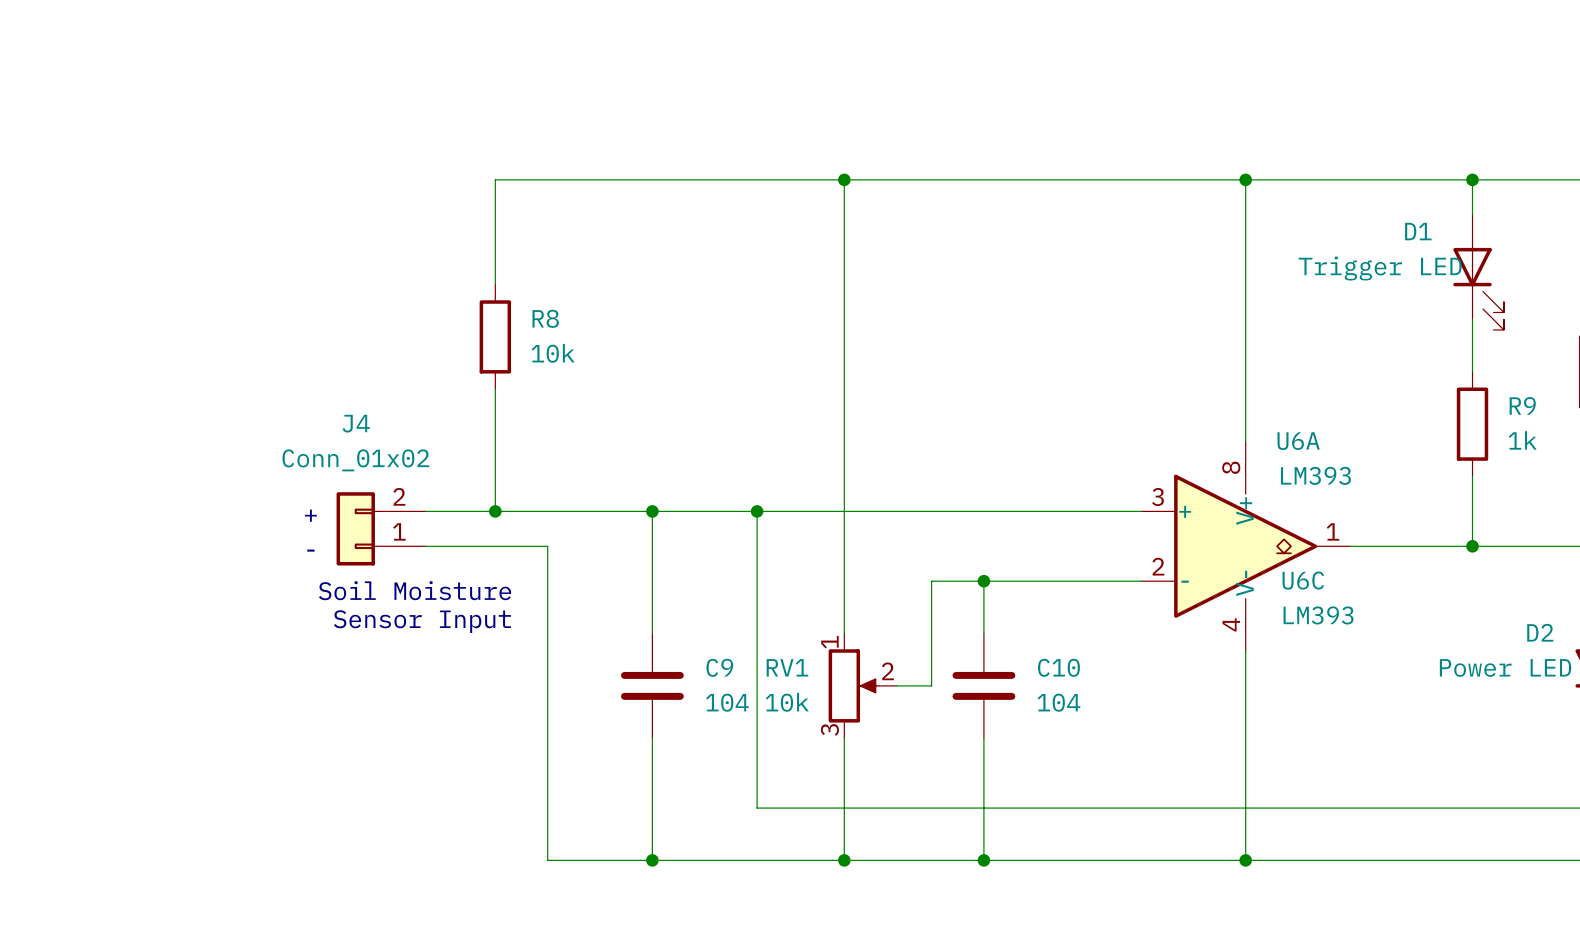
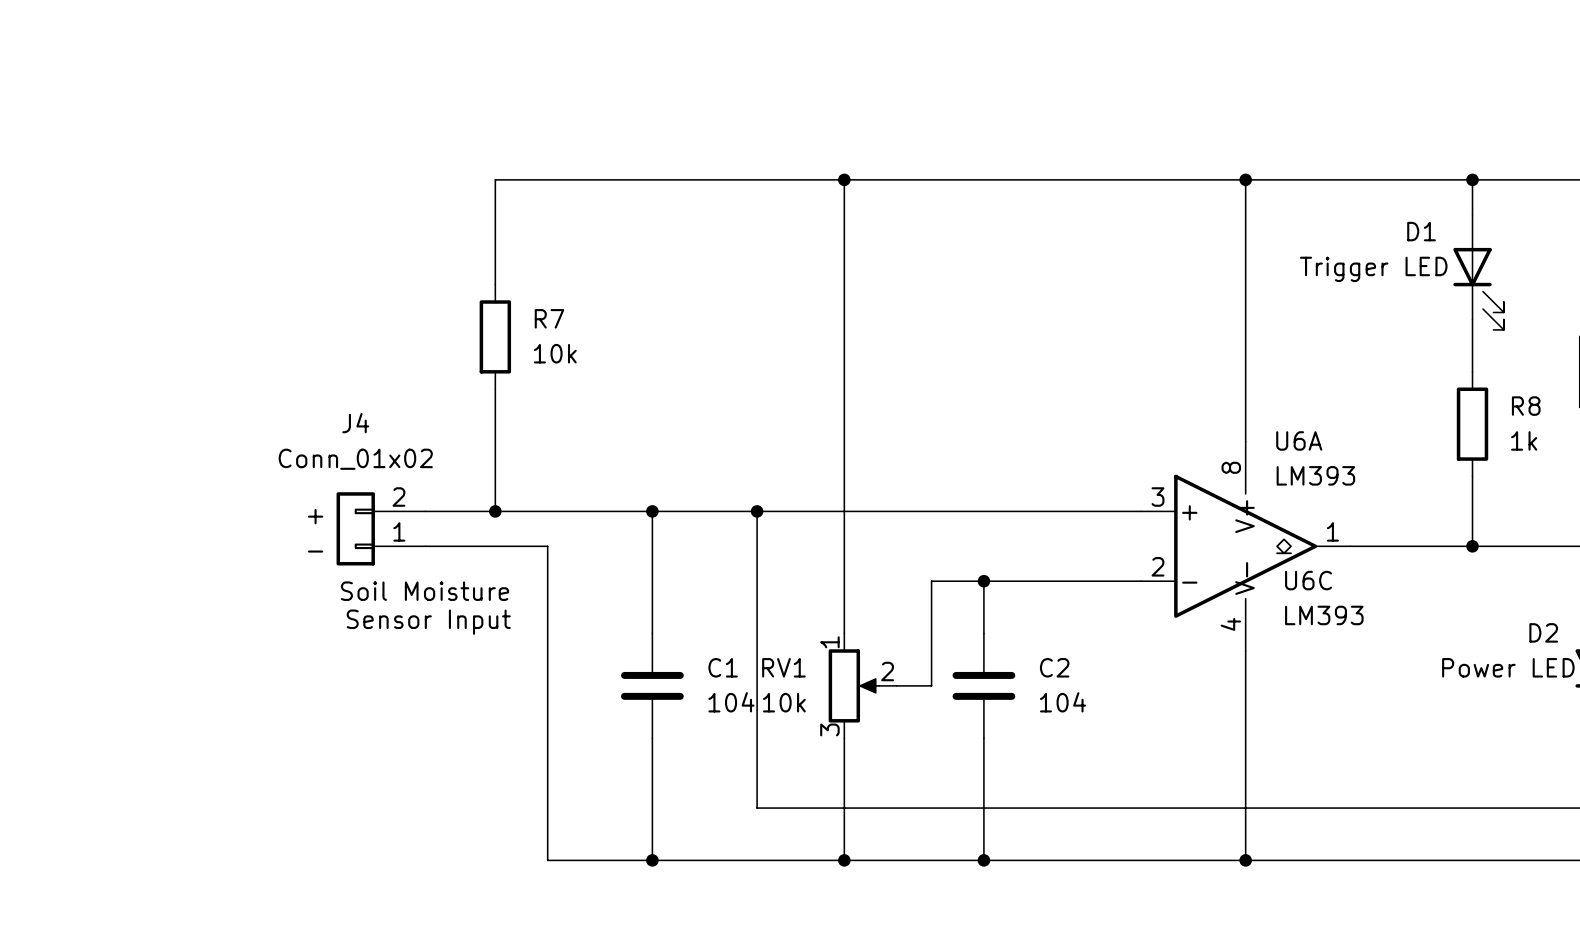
R8 name: R8 (545, 318) -> R7 (549, 318)
R9 name: R9 (1522, 405) -> R8 (1526, 406)
C9 name: C9 (719, 667) -> C1 (723, 667)
C10 name: C10 (1058, 667) -> C2 (1054, 667)

